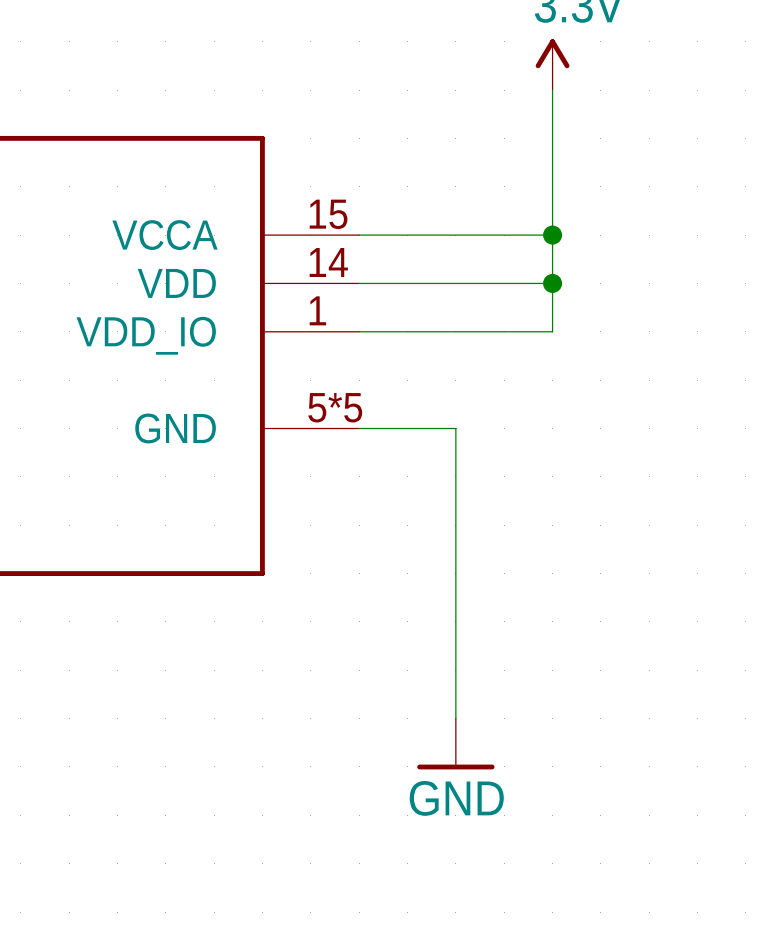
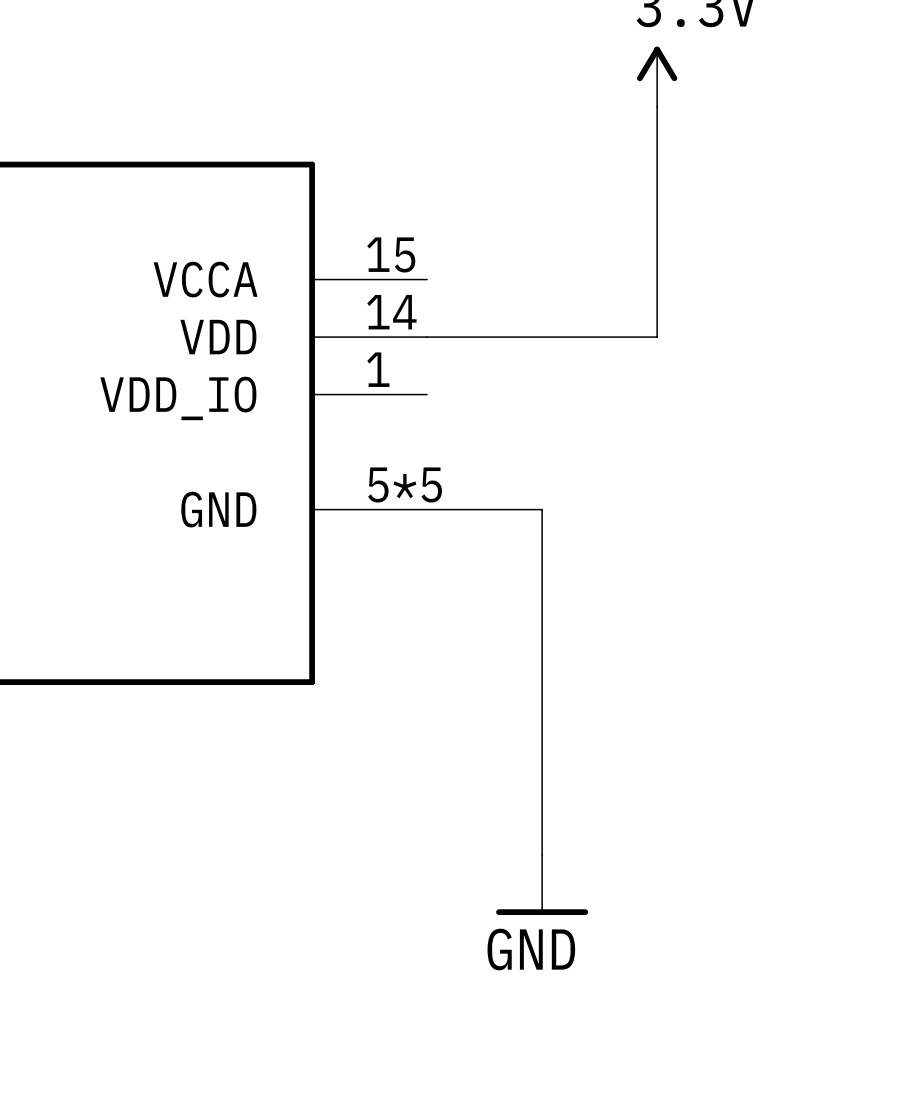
wire: (359, 235) (552, 235) -> none
junction: (552, 235) -> none
wire: (552, 283) (552, 331) (359, 331) -> none
junction: (552, 283) -> none

